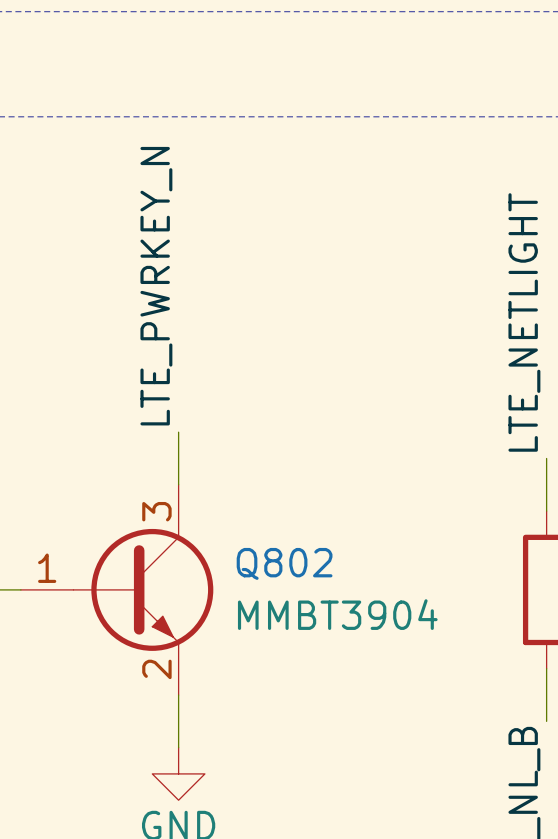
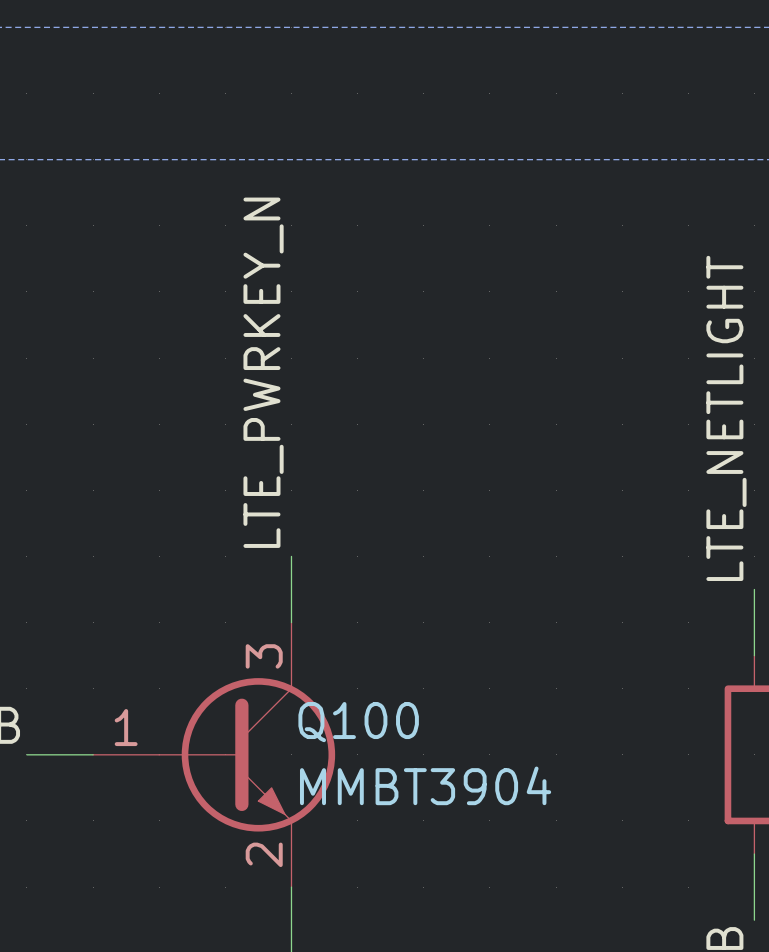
Q802 name: Q802 (284, 563) -> Q100 (358, 722)
Q802 value position: MMBT3904 (337, 614) -> MMBT3904 (425, 785)

